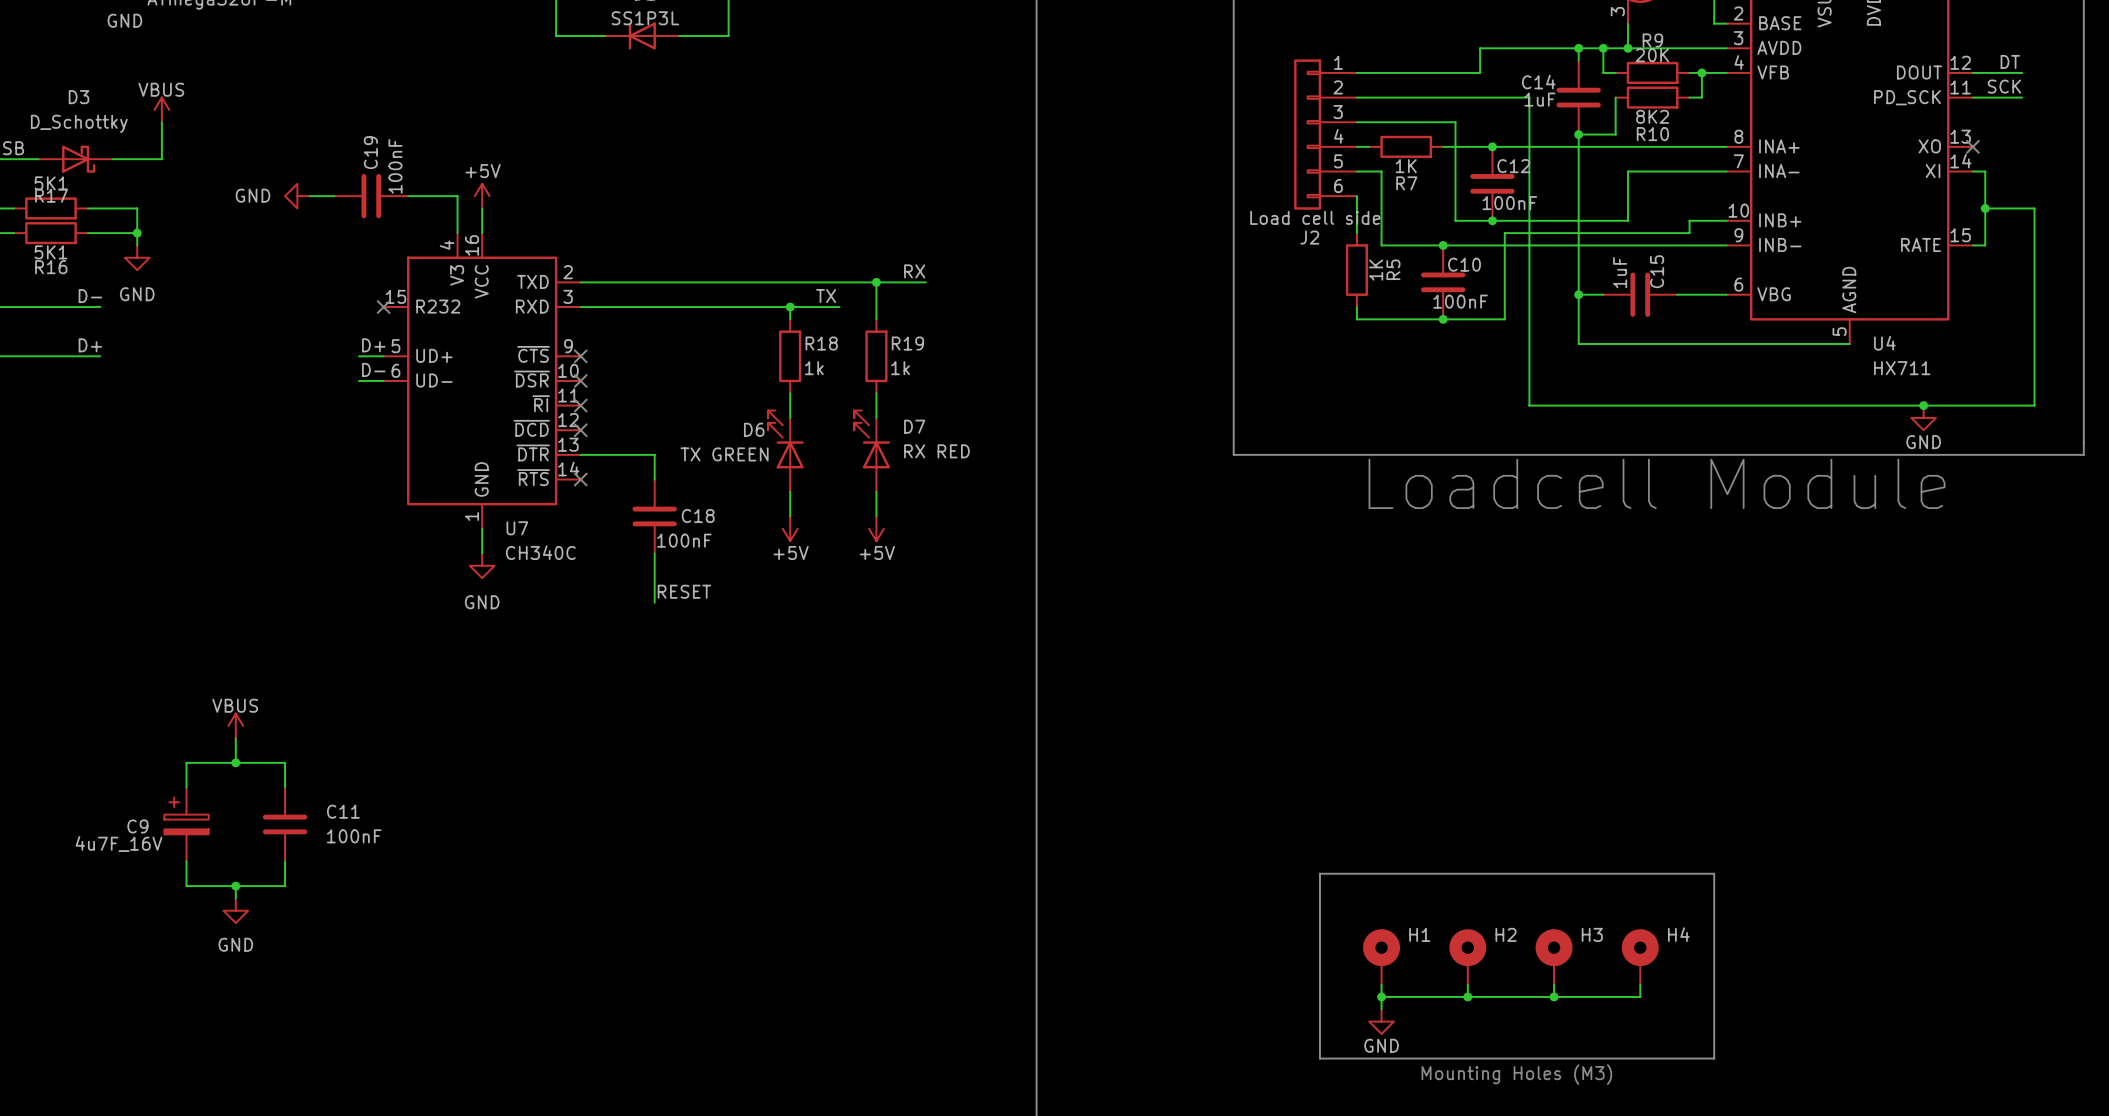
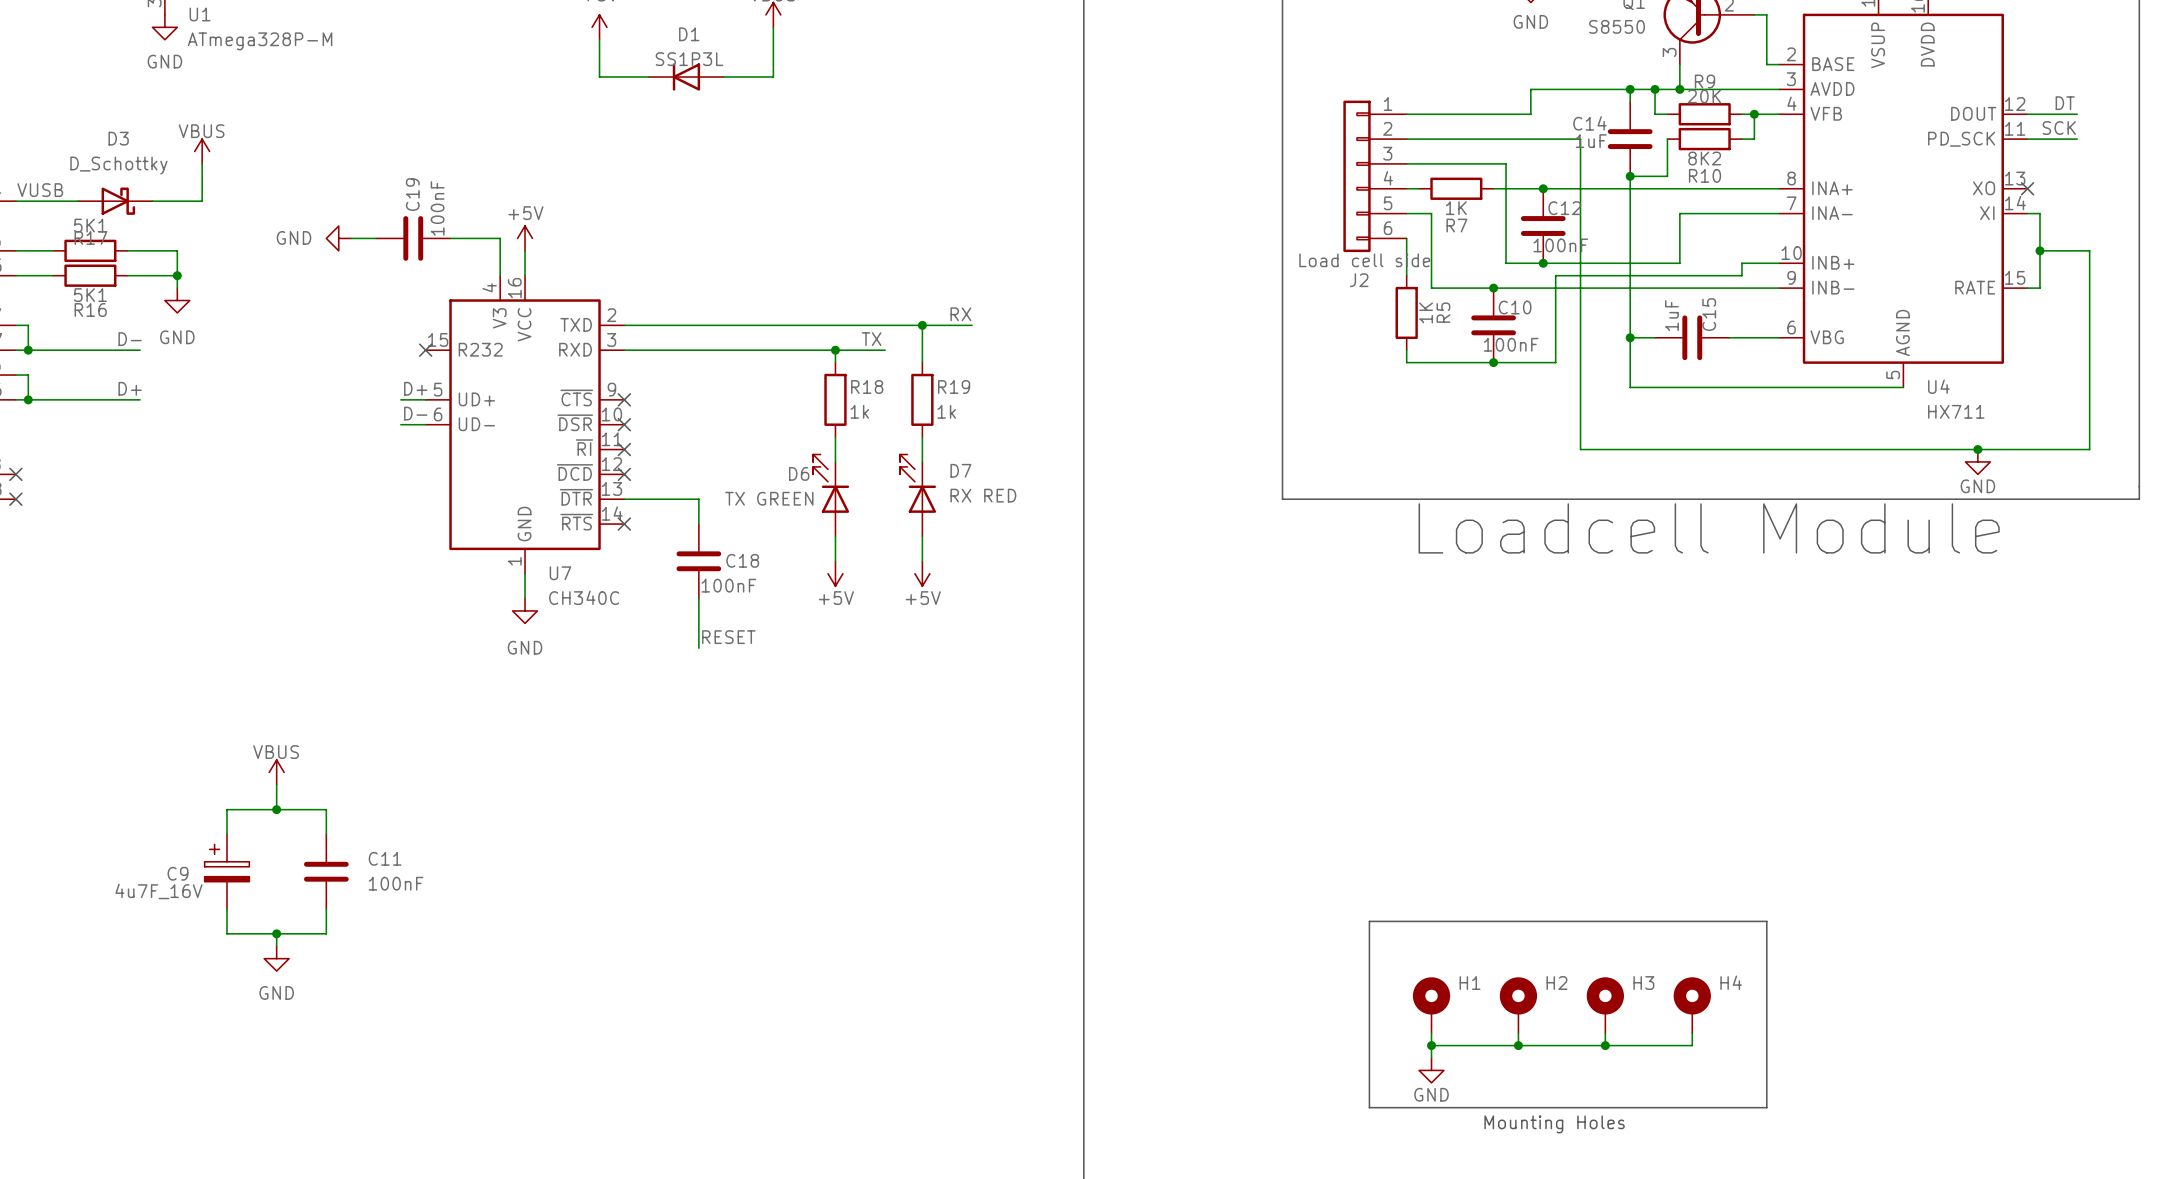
text: Mounting Holes (M3) (1516, 1074) -> Mounting Holes (1554, 1124)

